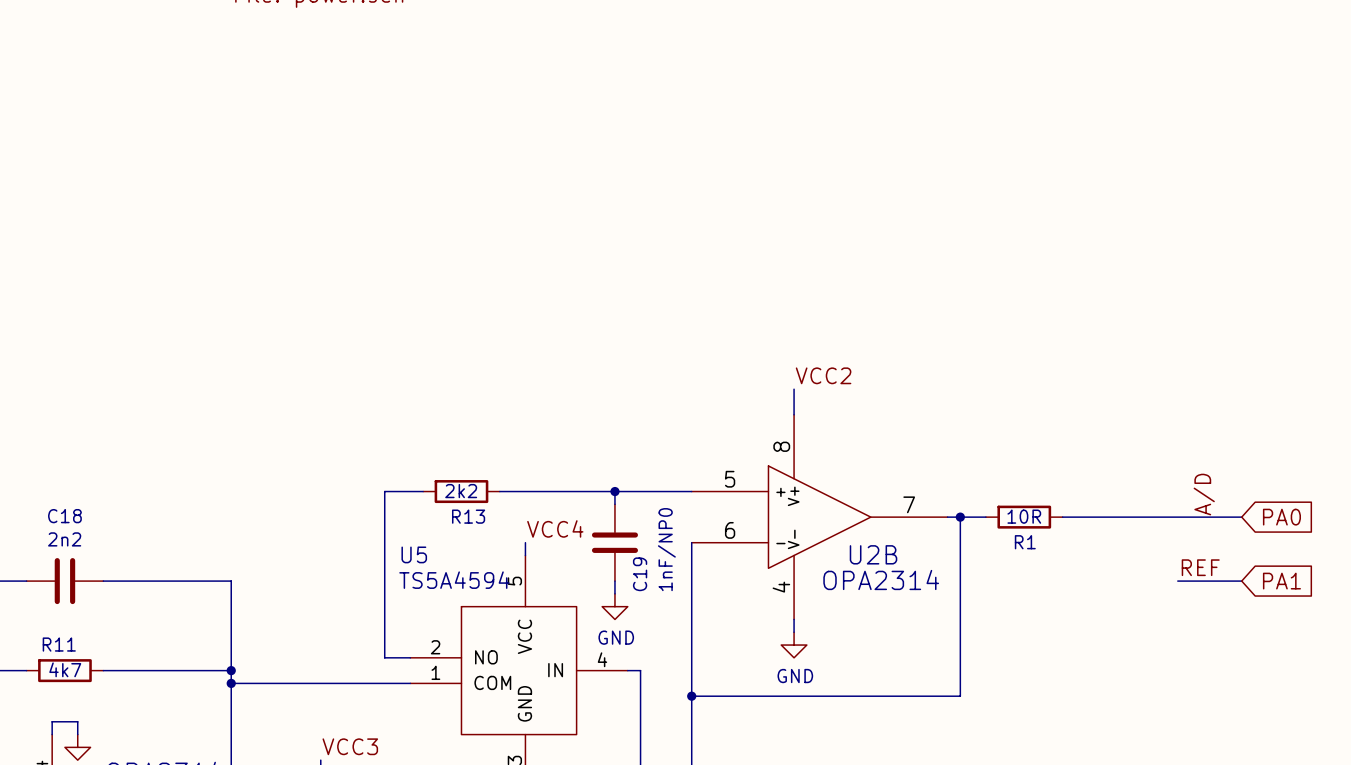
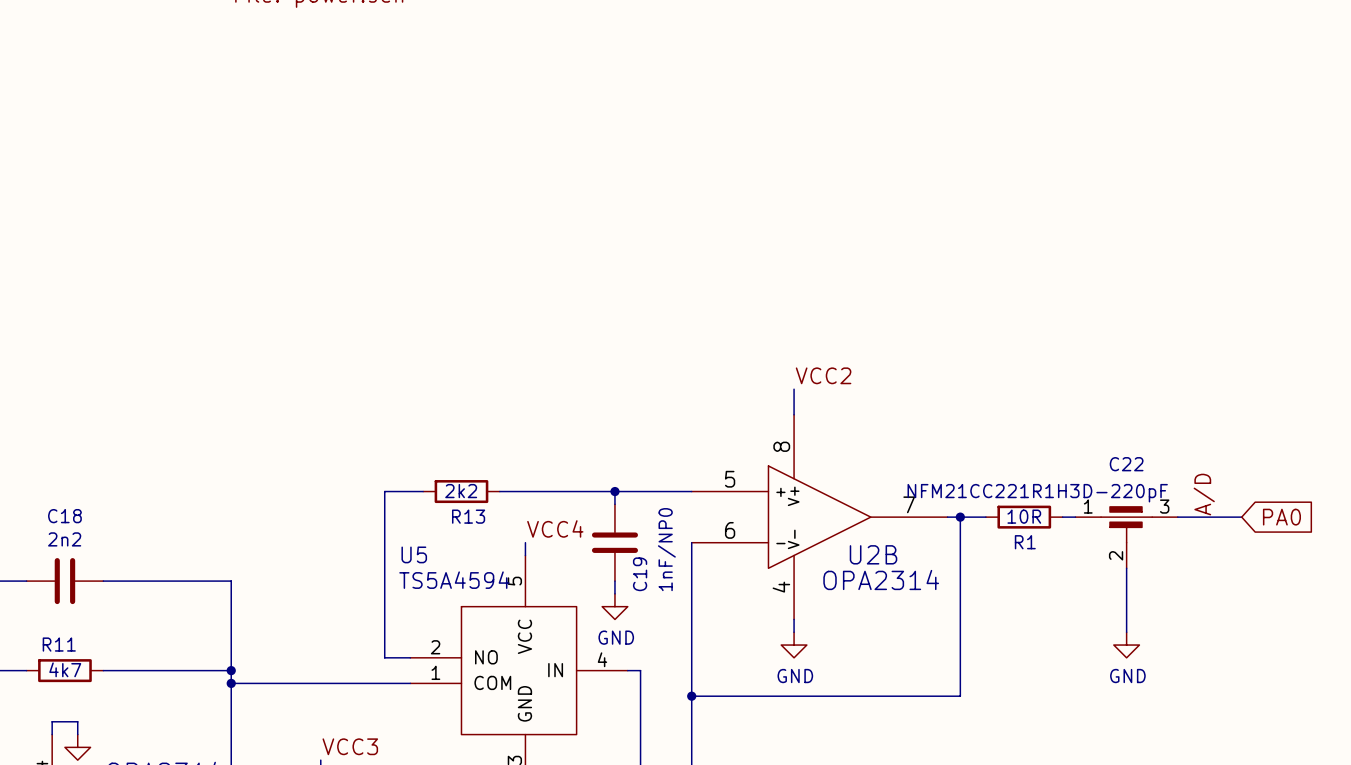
C22: none -> NFM21CC221R1H3D-220pF (1126, 537)
label: REF (1200, 567) -> none
wire: none -> (1126, 568) (1126, 632)
wire: (1177, 581) (1241, 581) -> none
global label: PA1 (1281, 581) -> none
power symbol: none -> GND (1126, 645)

